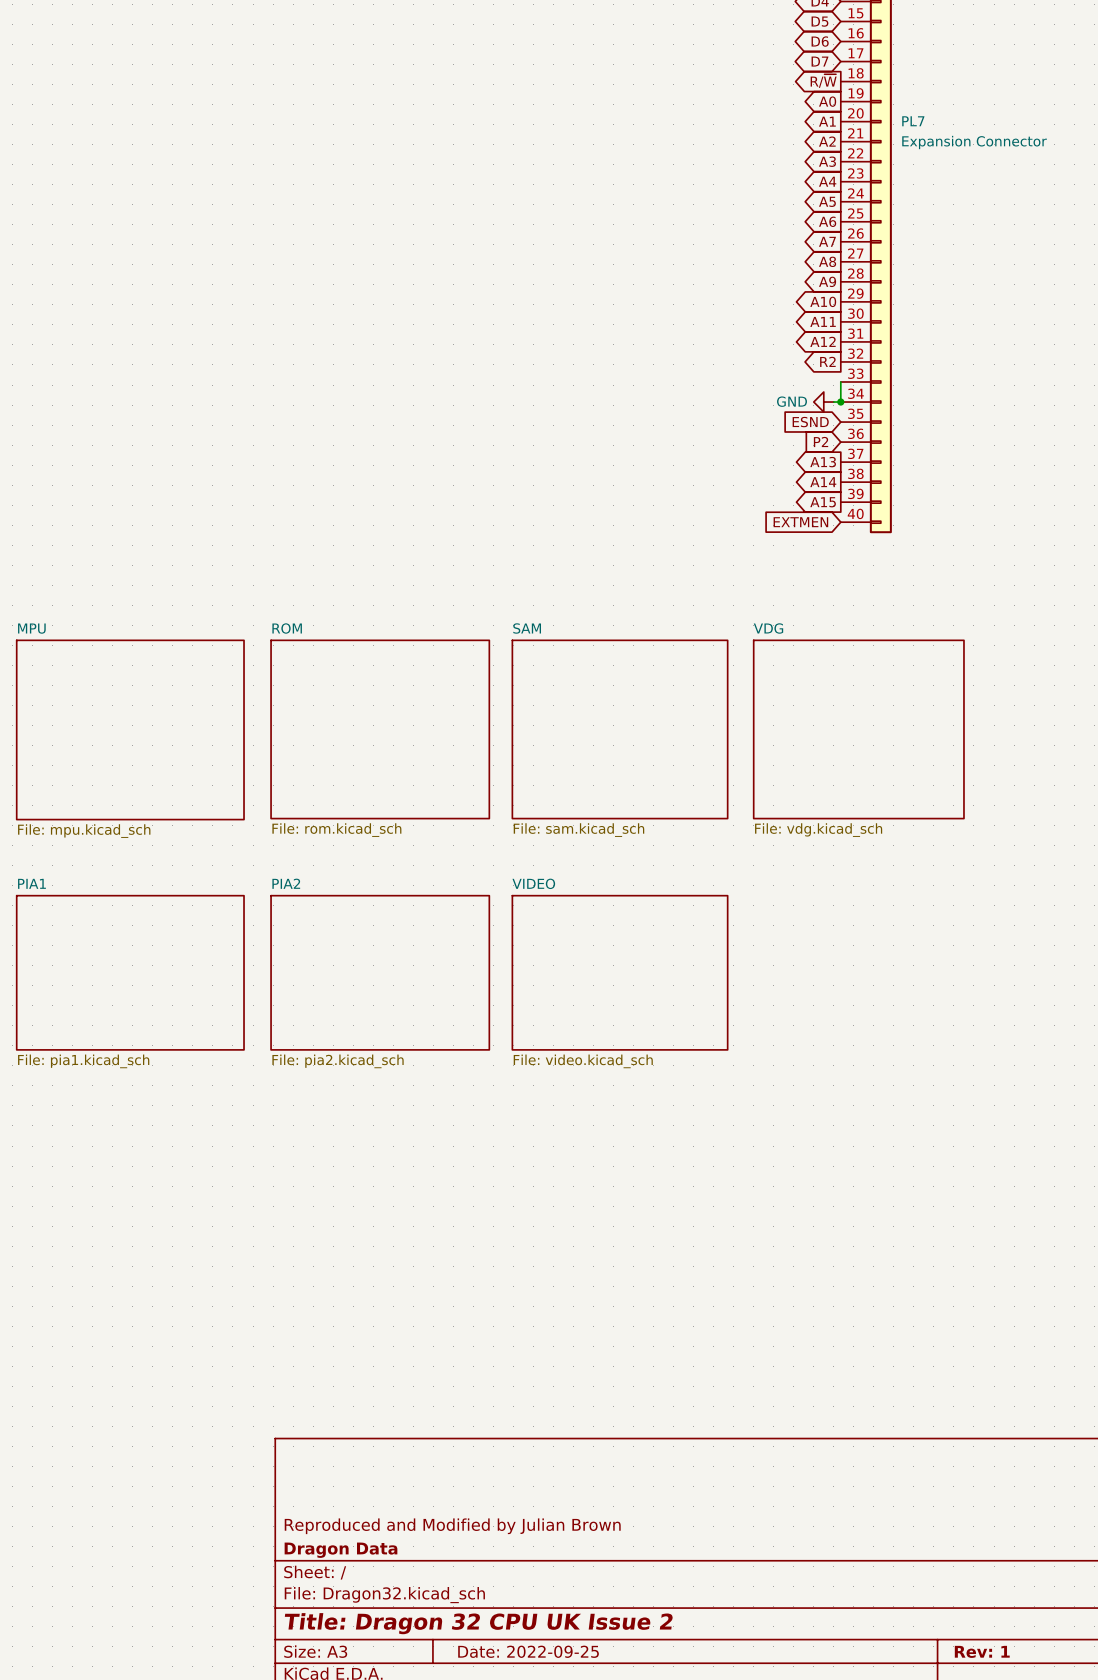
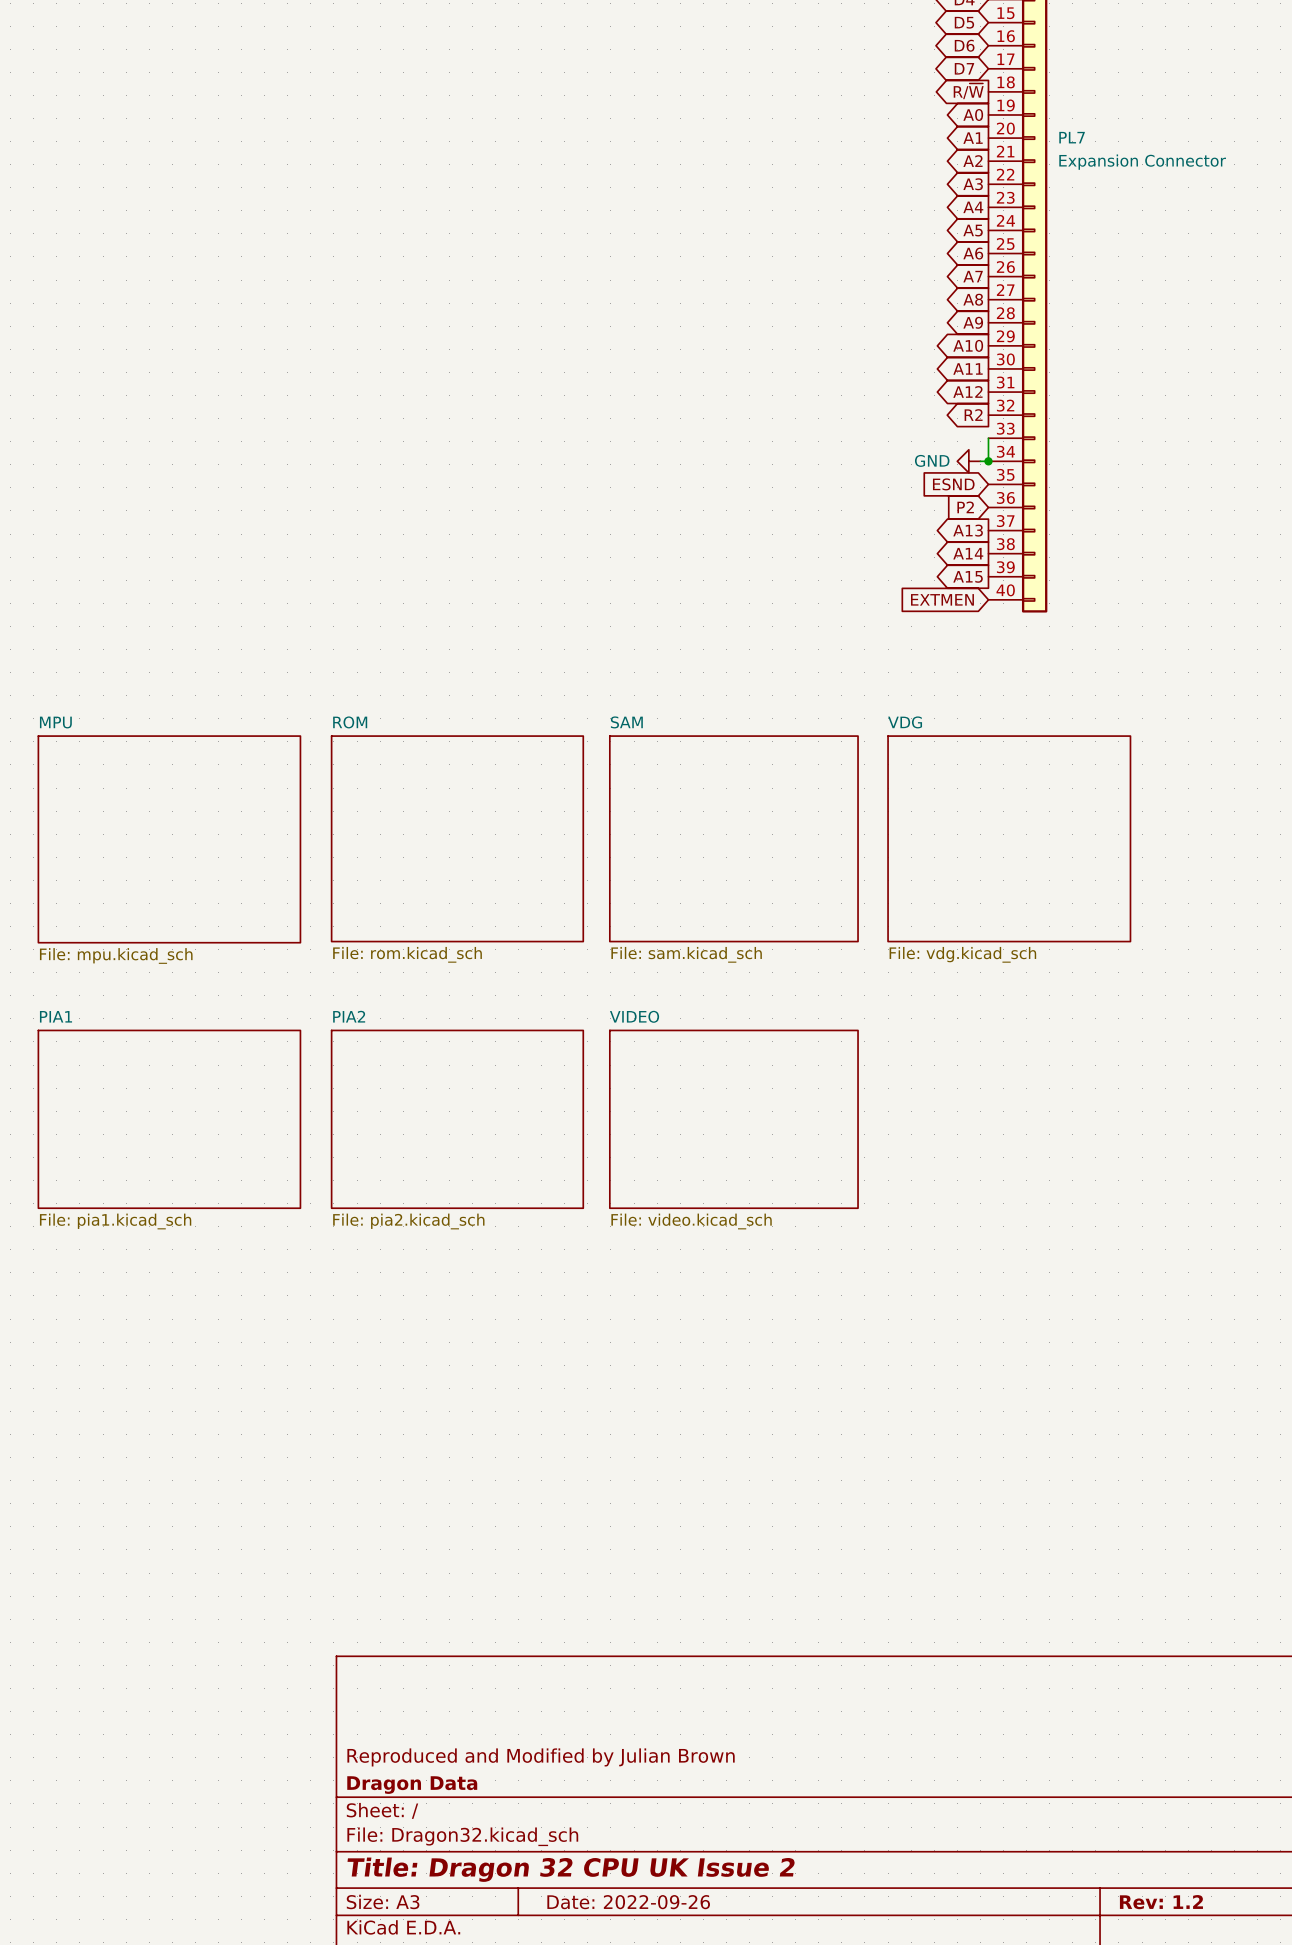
title block: Date: 2022-09-25 (528, 1651) -> Date: 2022-09-26 (628, 1902)
title block: Rev: 1 (982, 1651) -> Rev: 1.2 (1161, 1902)

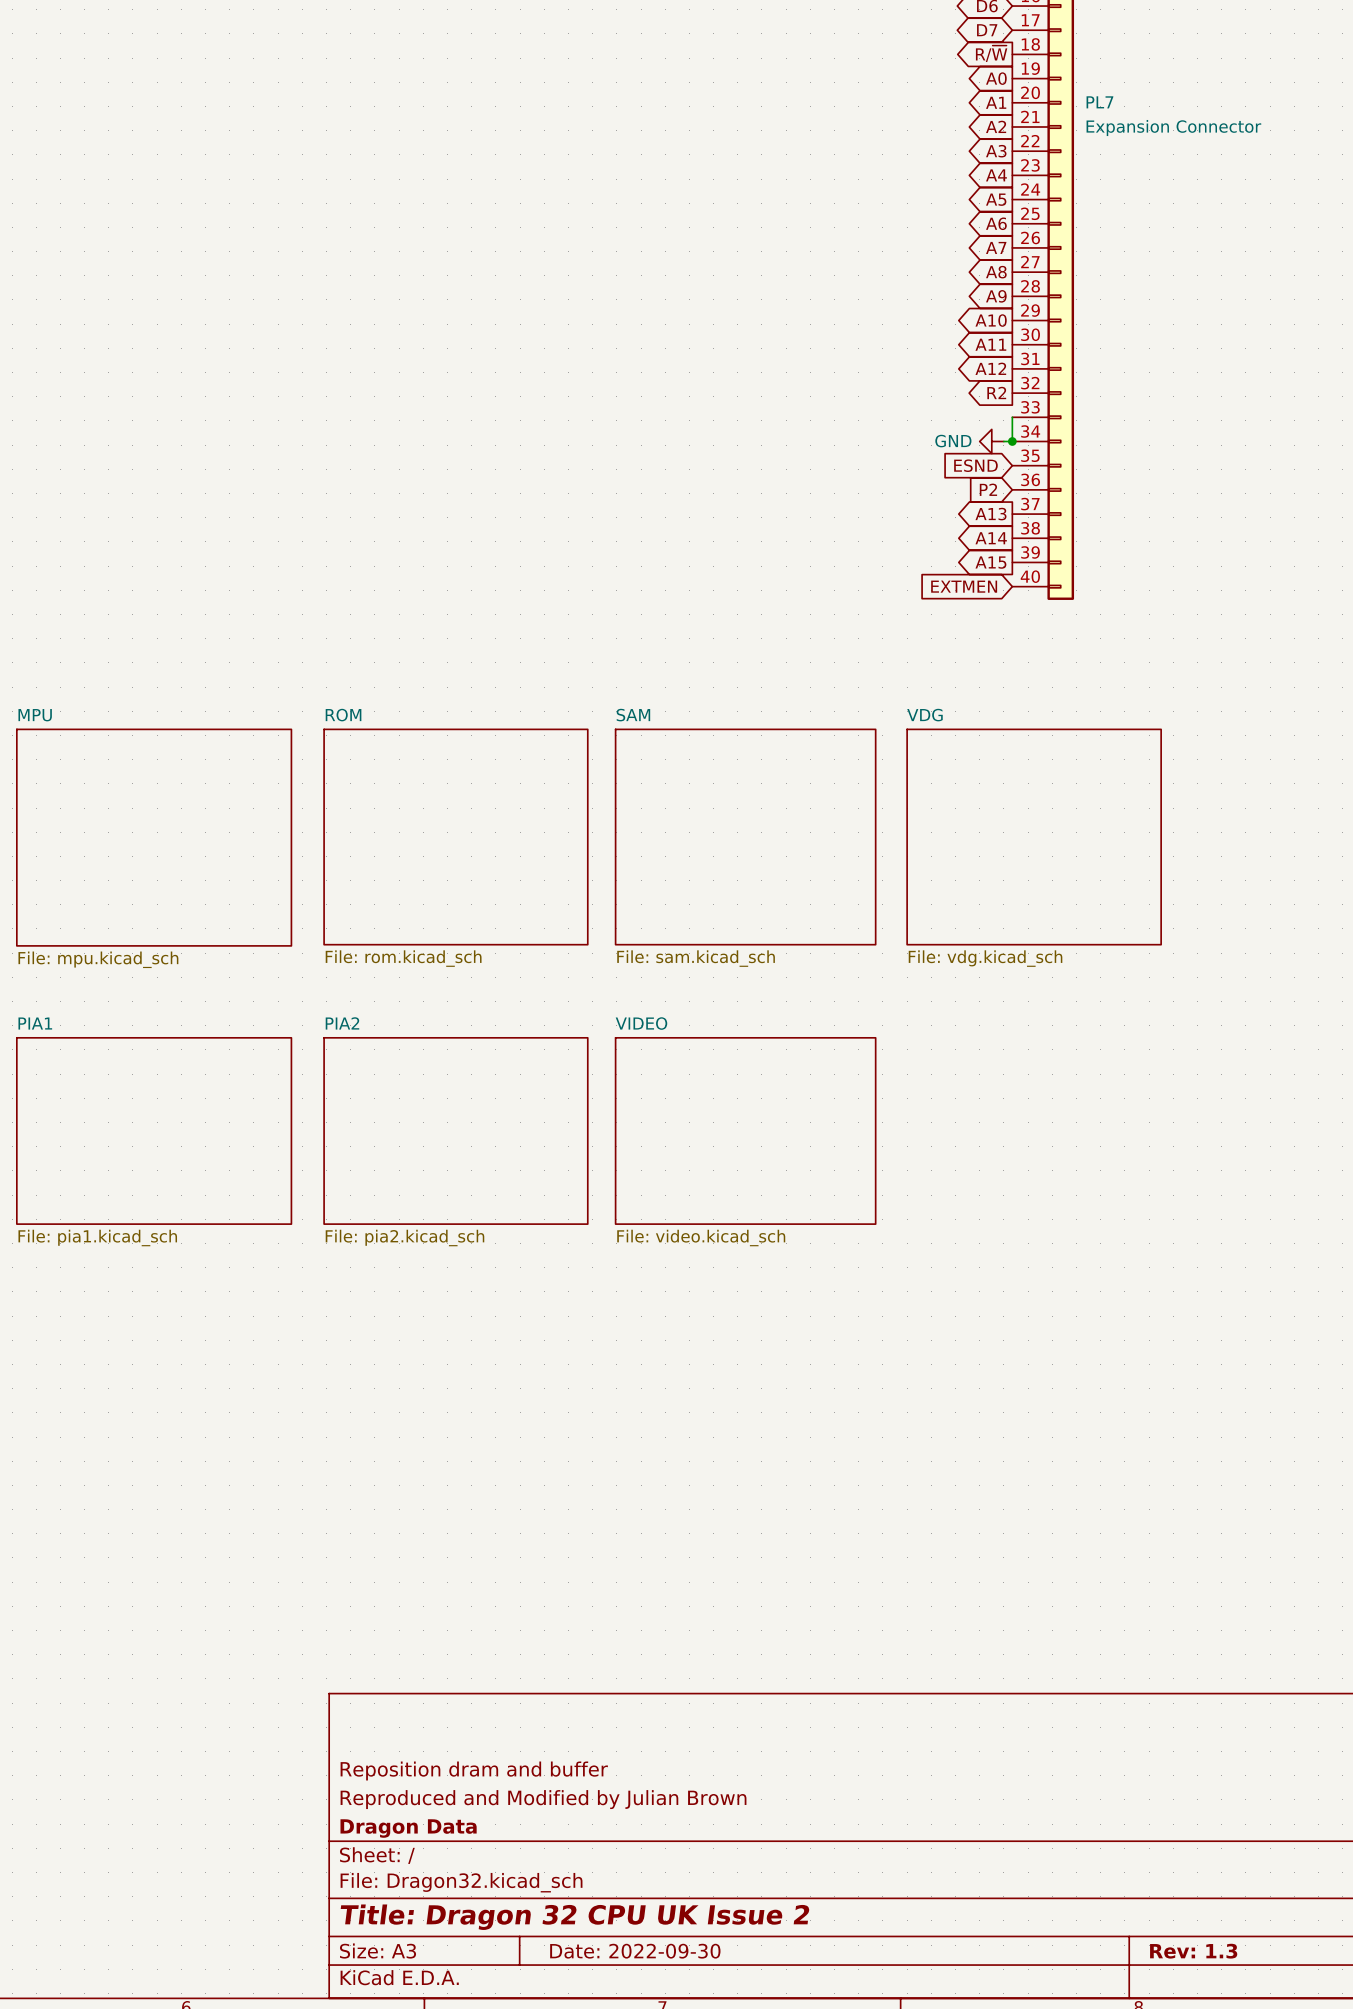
title block: none -> Reposition dram and buffer (474, 1770)
title block: Date: 2022-09-26 (628, 1902) -> Date: 2022-09-30 (635, 1951)
title block: Rev: 1.2 (1161, 1902) -> Rev: 1.3 (1193, 1951)

